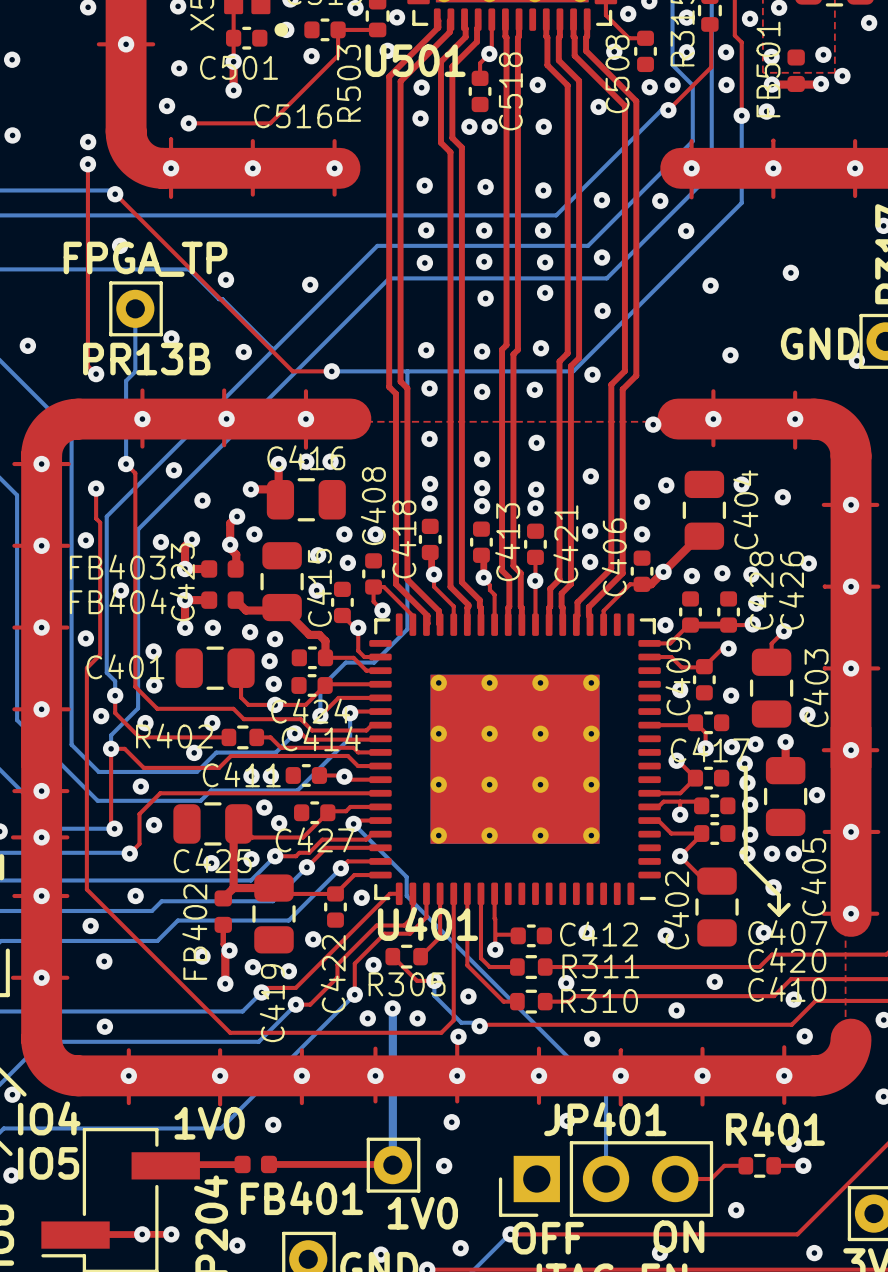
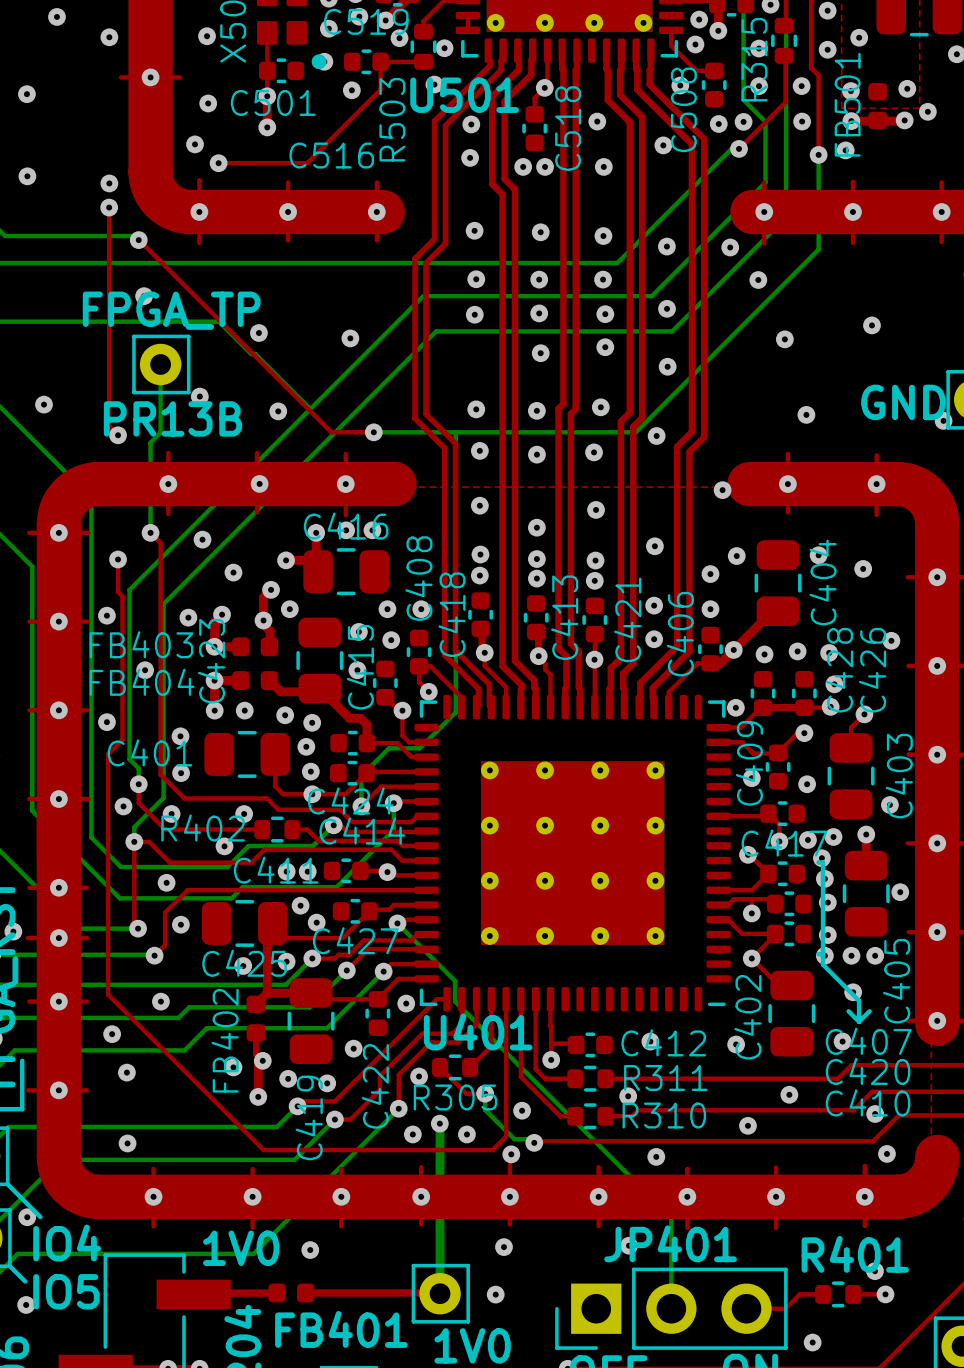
top track: (437, 19) (438, 27) (389, 76) (389, 387) (396, 393) (396, 584) (427, 615) (427, 623) -> none
top track: (450, 19) (449, 32) (400, 81) (400, 381) (407, 388) (407, 579) (438, 611) (438, 623) -> none
top track: none -> (488, 59) (490, 65) (434, 121) (434, 239) (415, 258) (415, 418) (444, 448) (444, 655) (478, 688) (478, 705) (476, 707)
top track: none -> (503, 59) (501, 61) (501, 70) (445, 125) (445, 243) (425, 263) (425, 414) (455, 443) (455, 650) (489, 684) (489, 705) (491, 707)

